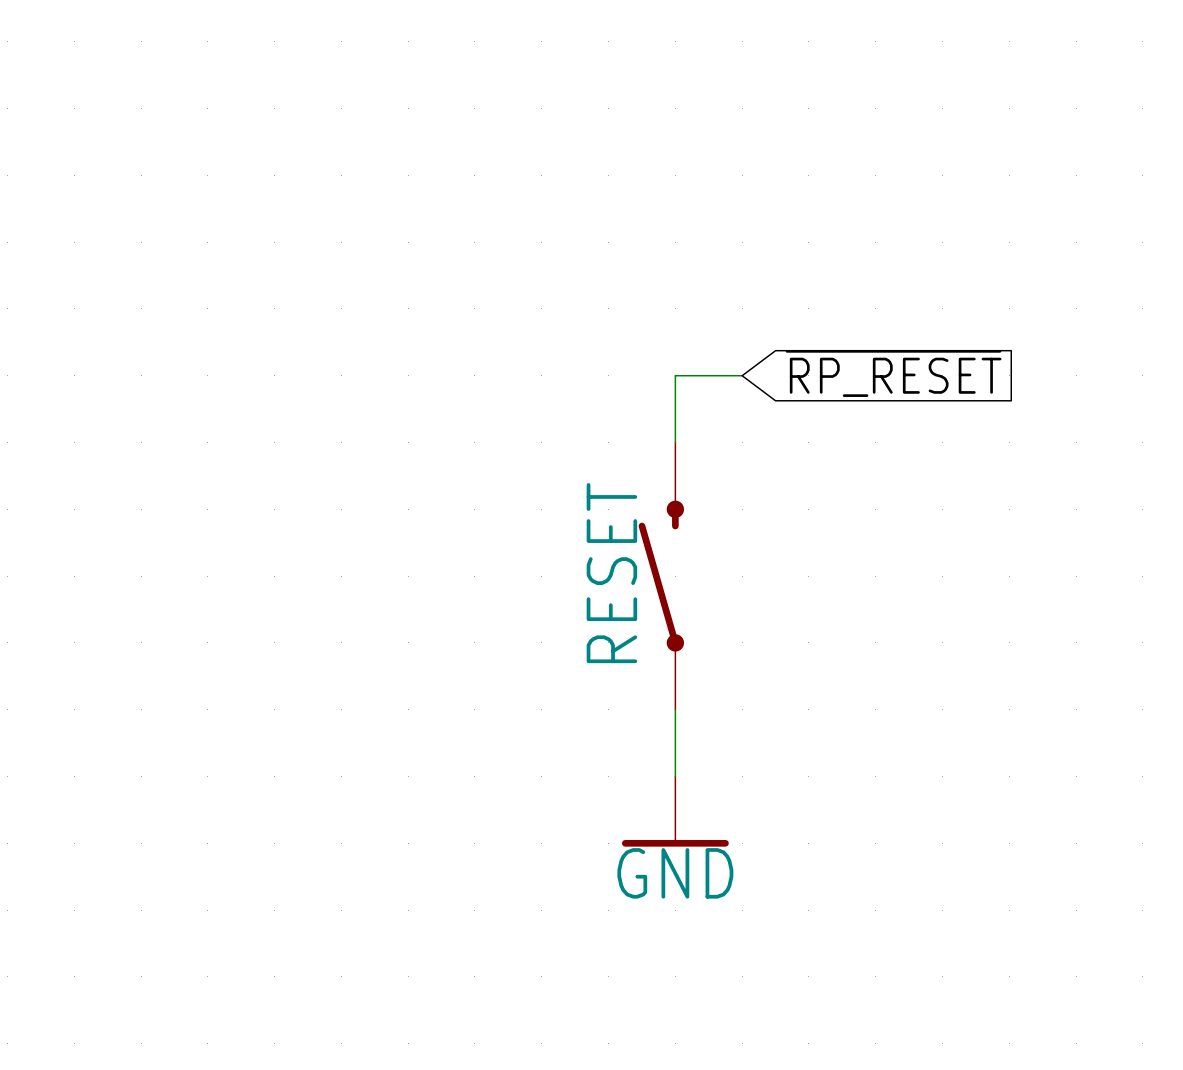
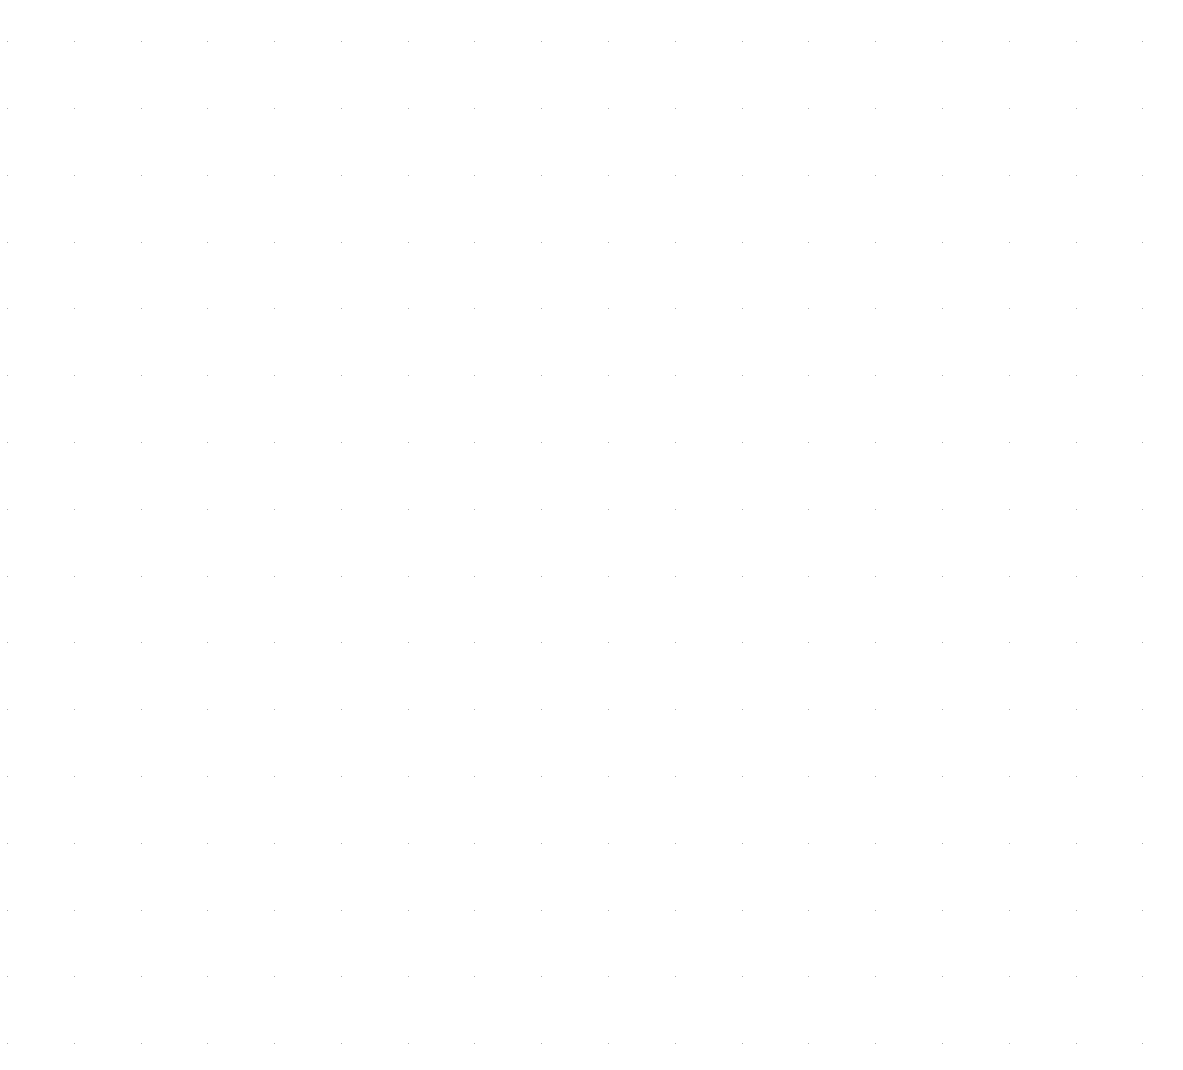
global label: ~{RP_RESET} (893, 373) -> none
wire: (742, 375) (675, 375) (675, 442) -> none
RESET: (661, 576) -> none
wire: (675, 709) (675, 776) -> none
power symbol: GND (675, 811) -> none

